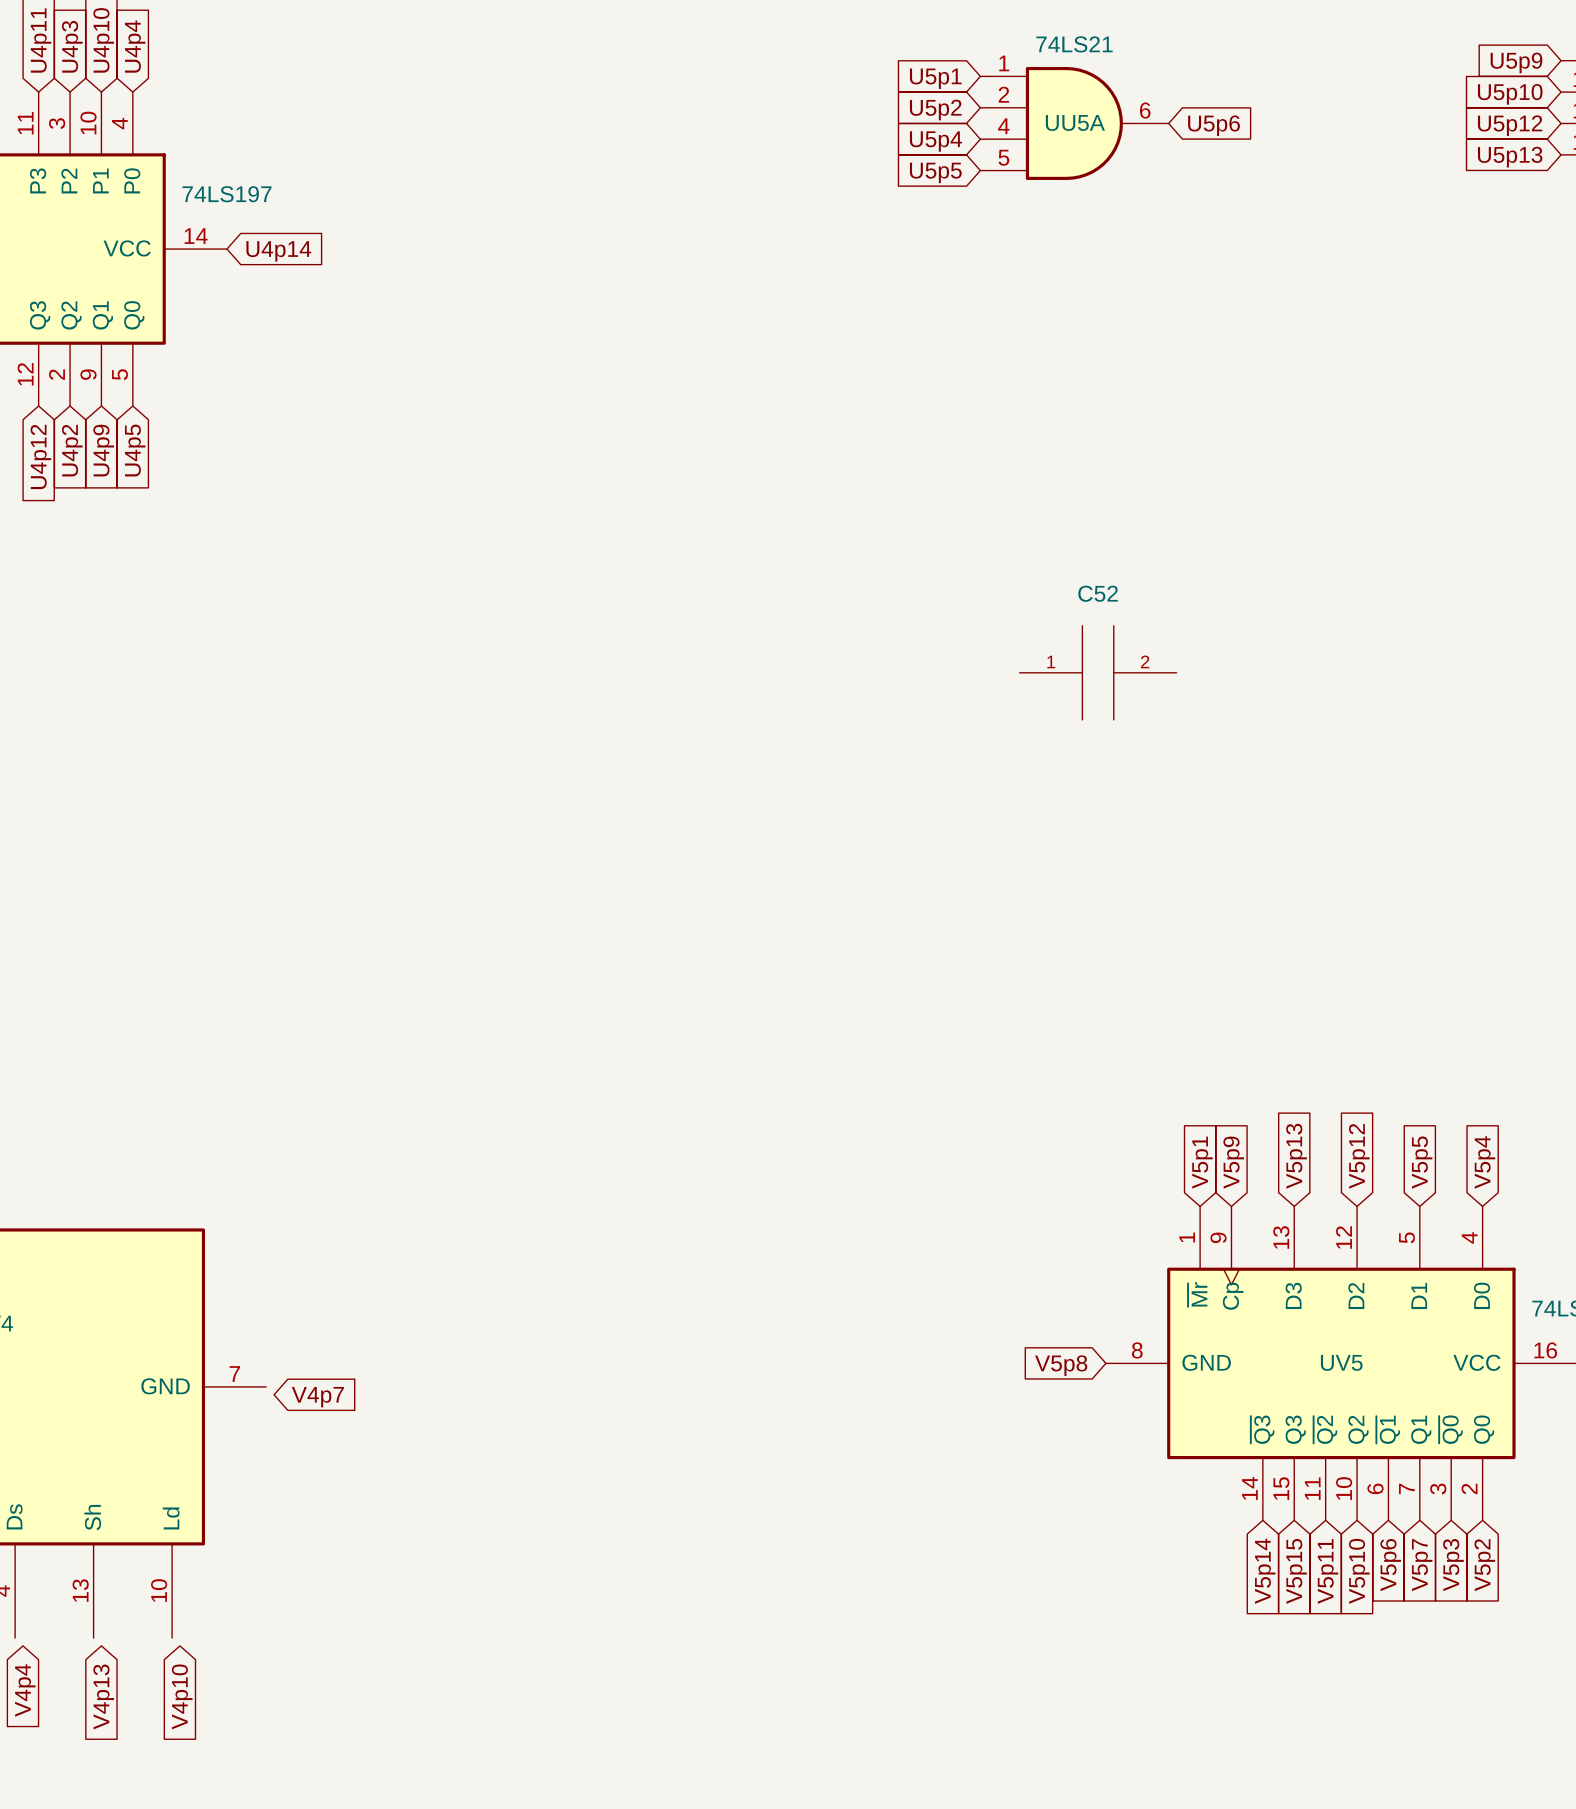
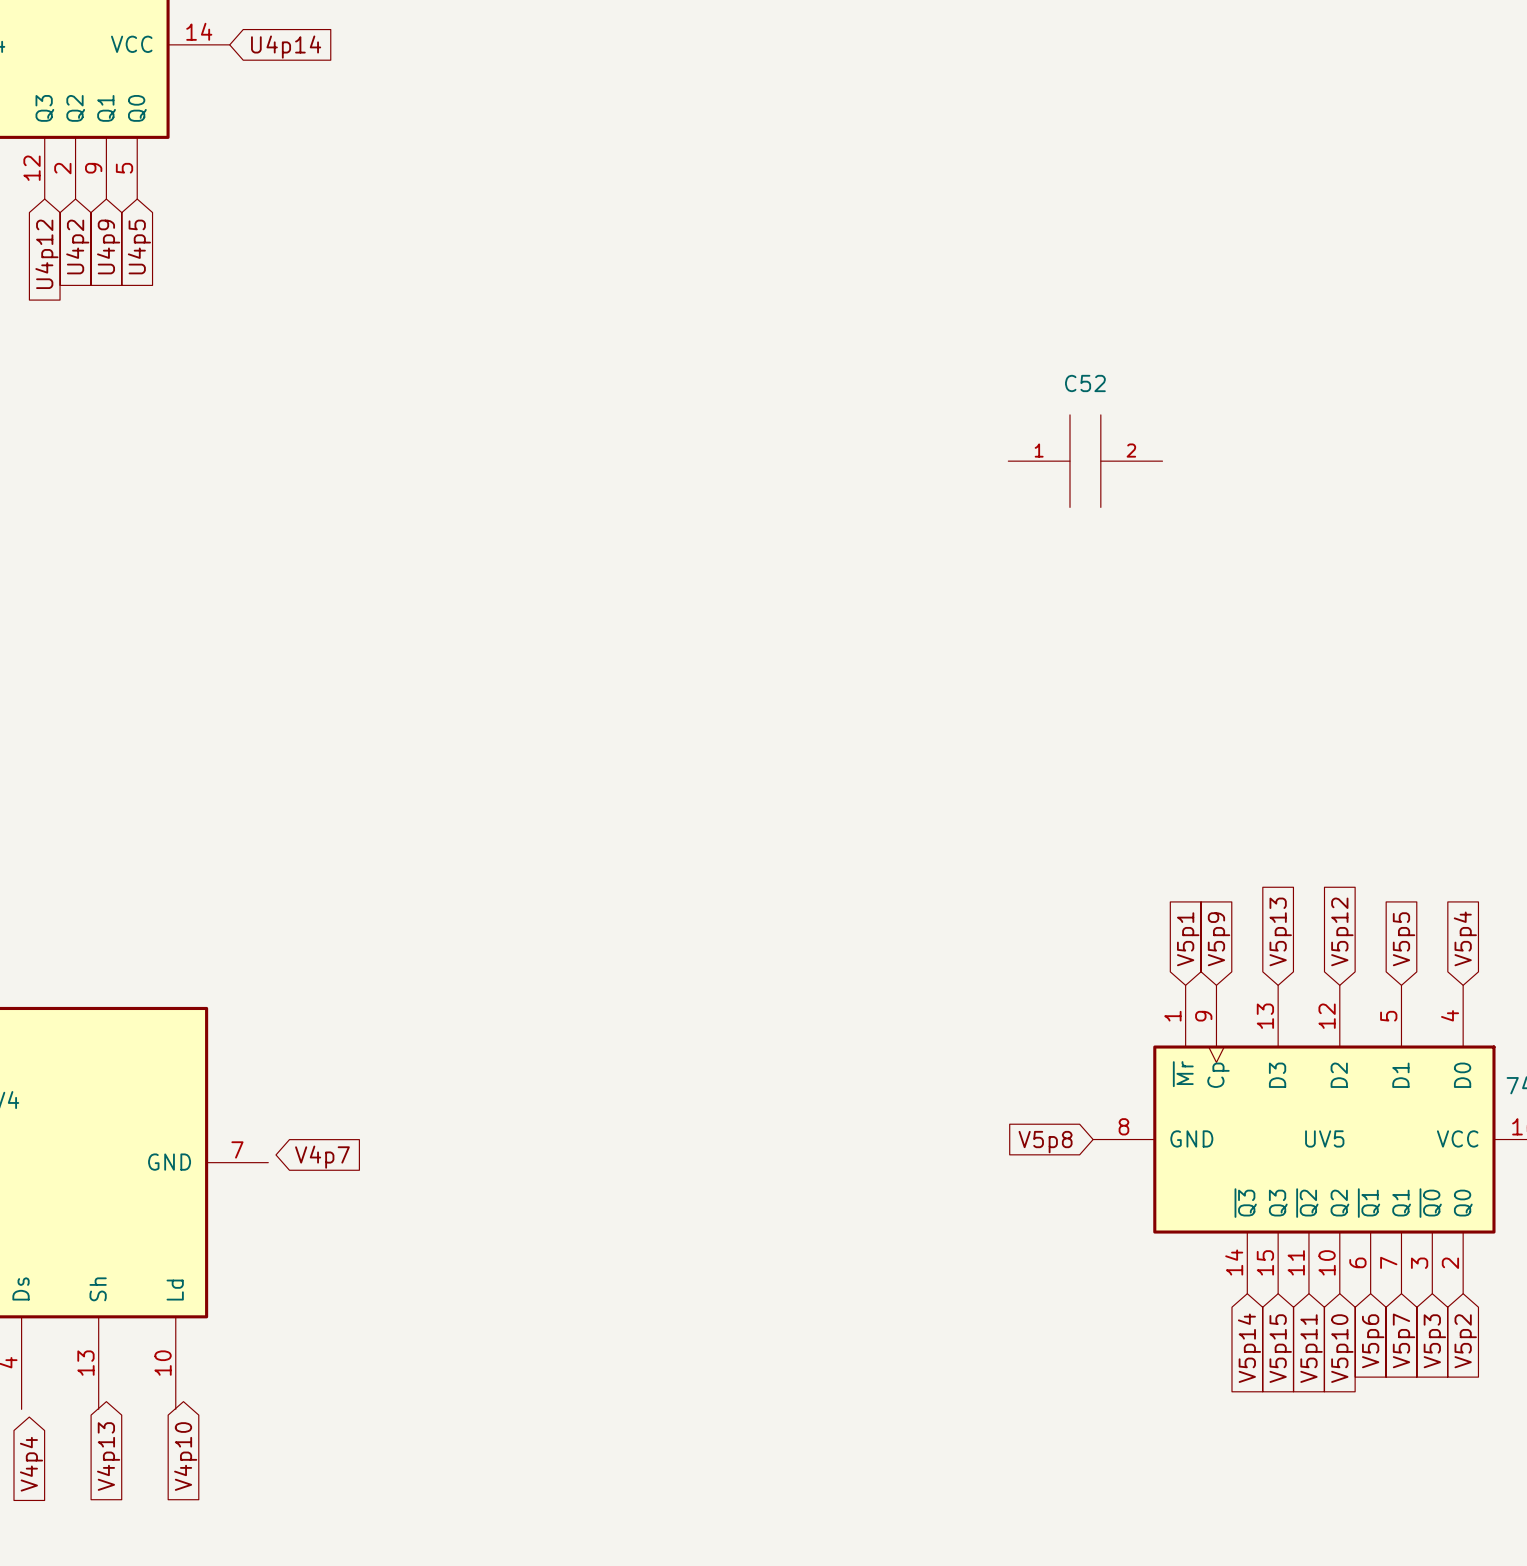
global label position: V4p7 (317, 1397) -> V4p7 (322, 1157)
global label position: V4p13 (103, 1696) -> V4p13 (108, 1456)
global label position: V4p10 (182, 1696) -> V4p10 (185, 1456)

